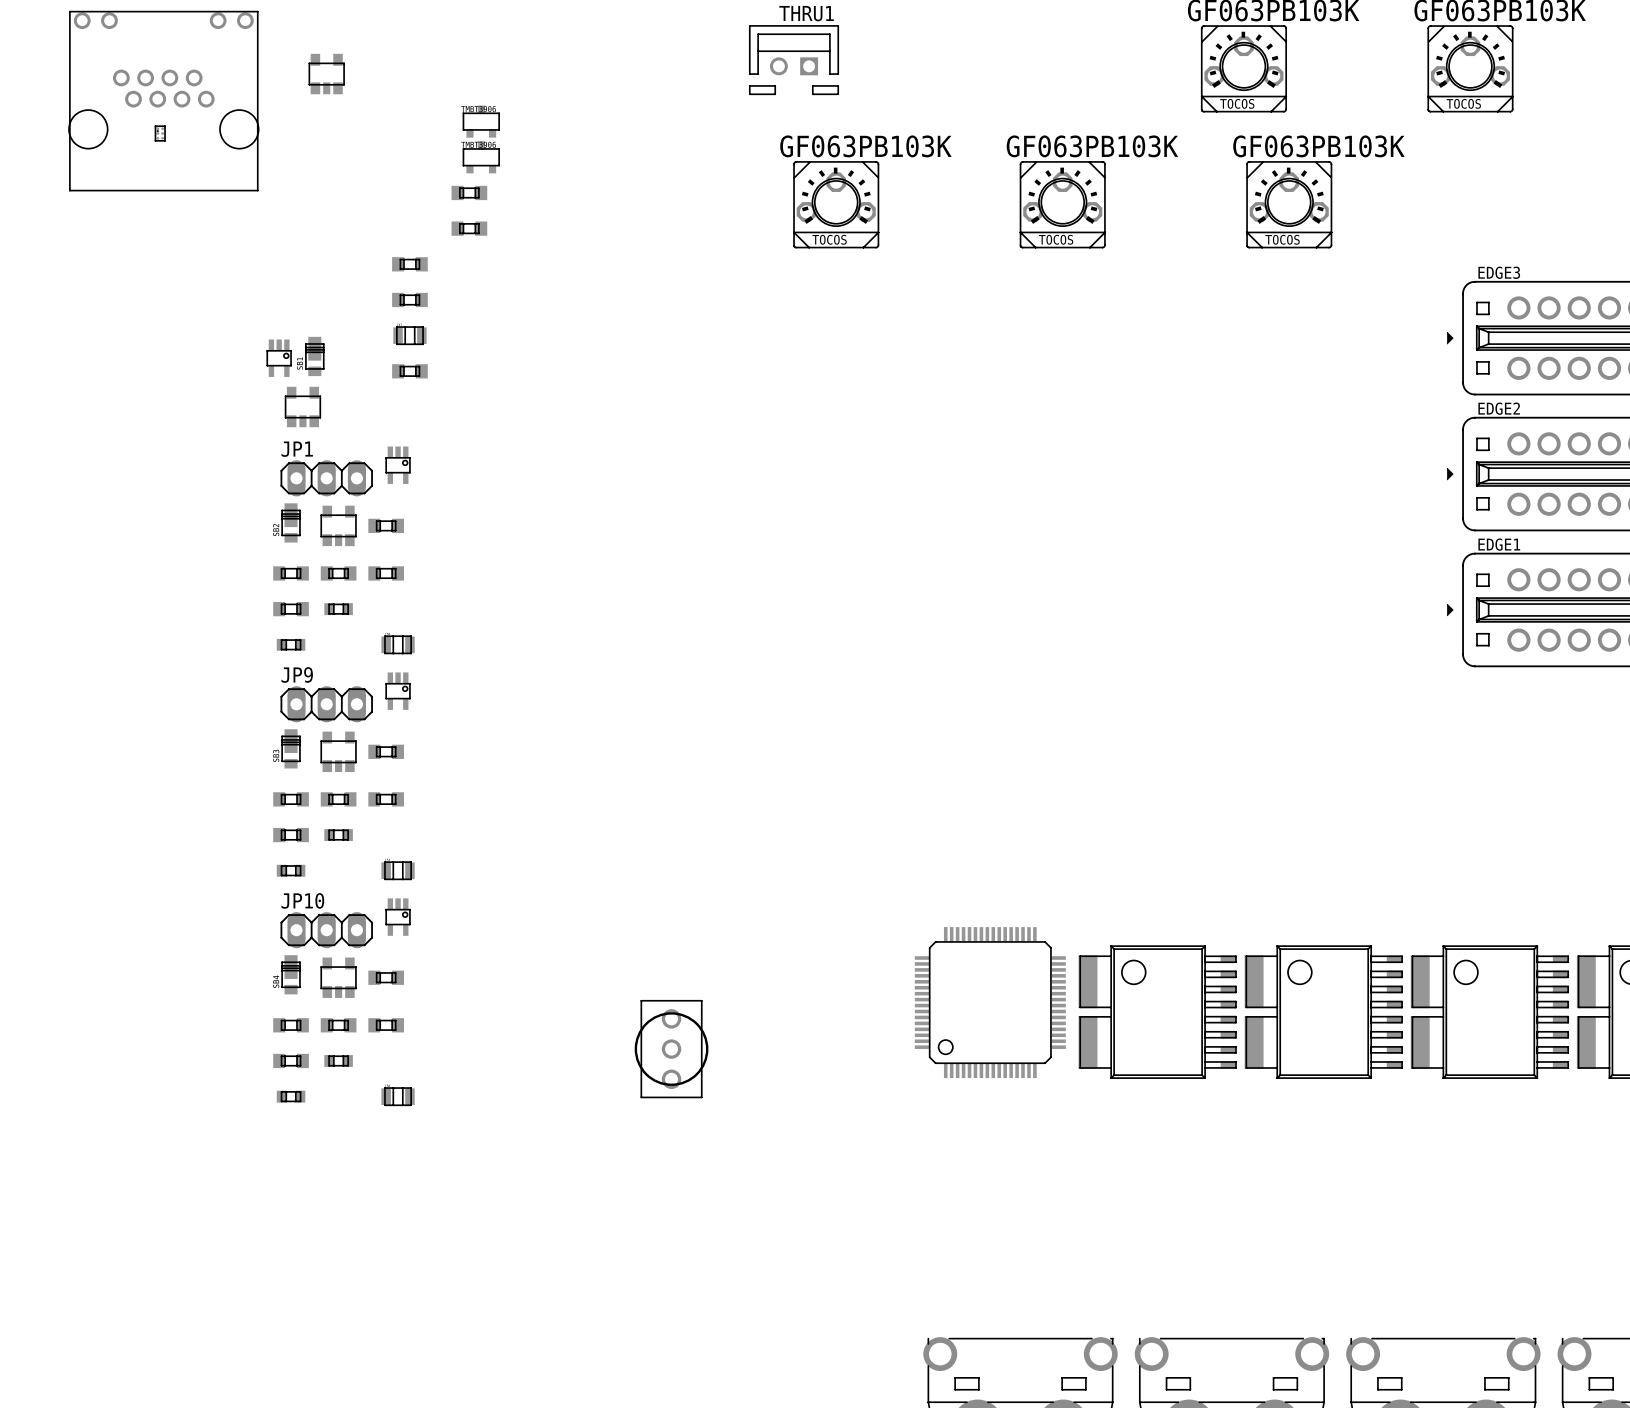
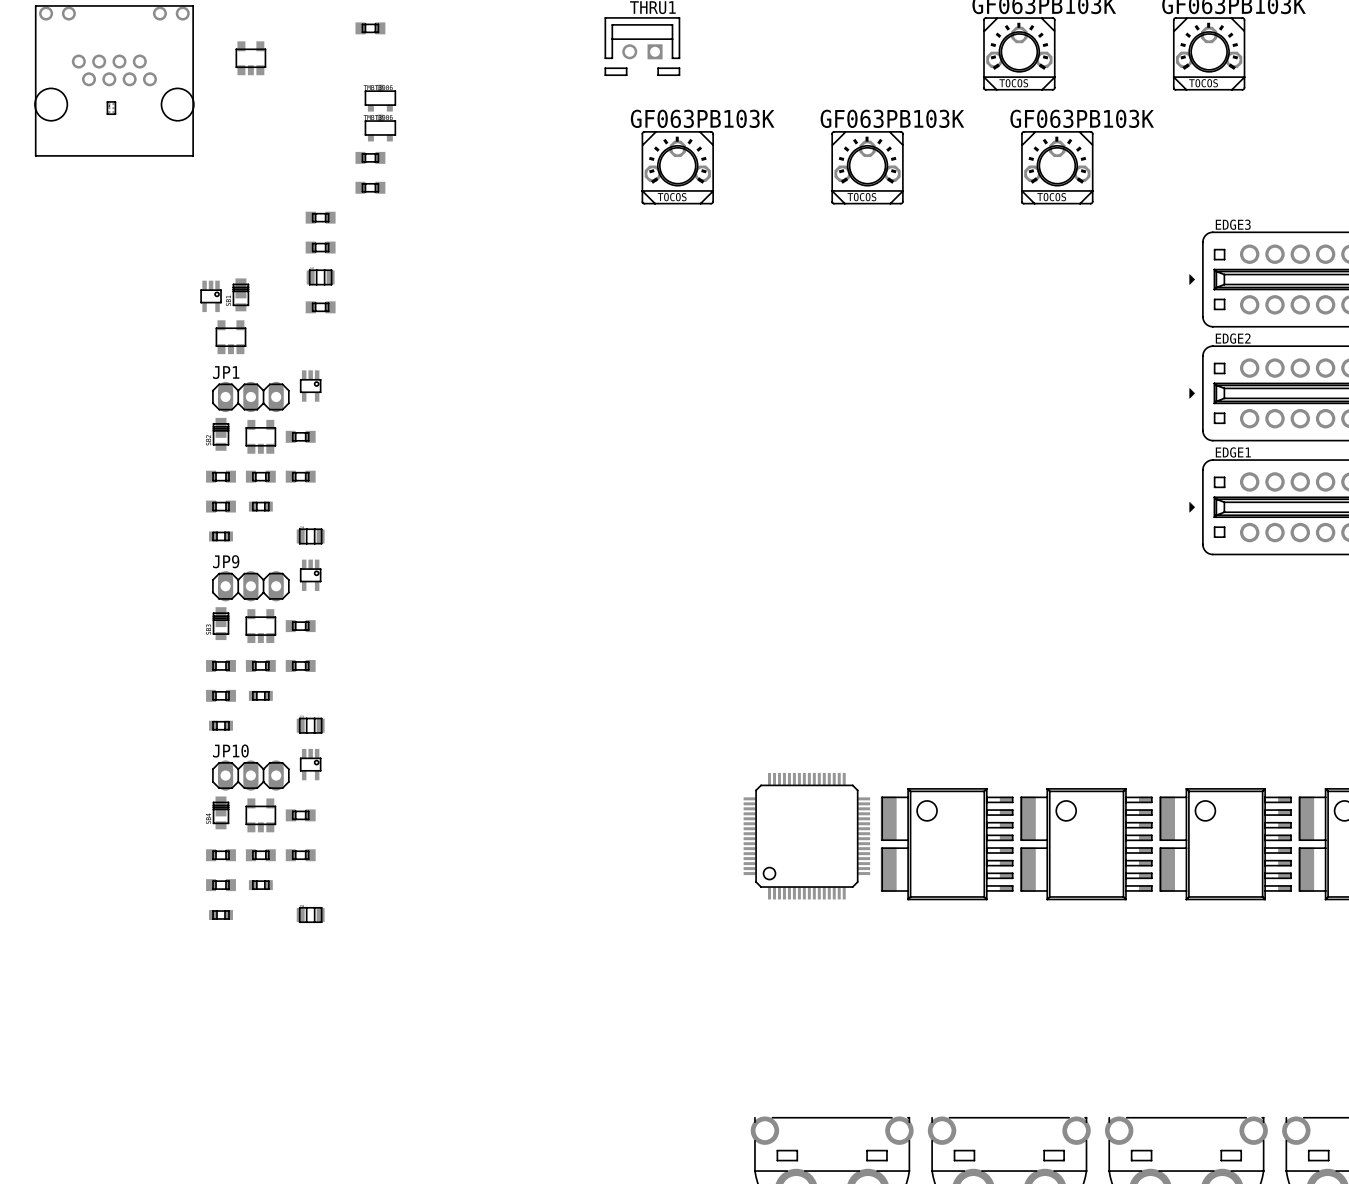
part: none -> (370, 28)
part: (671, 1049) -> none

